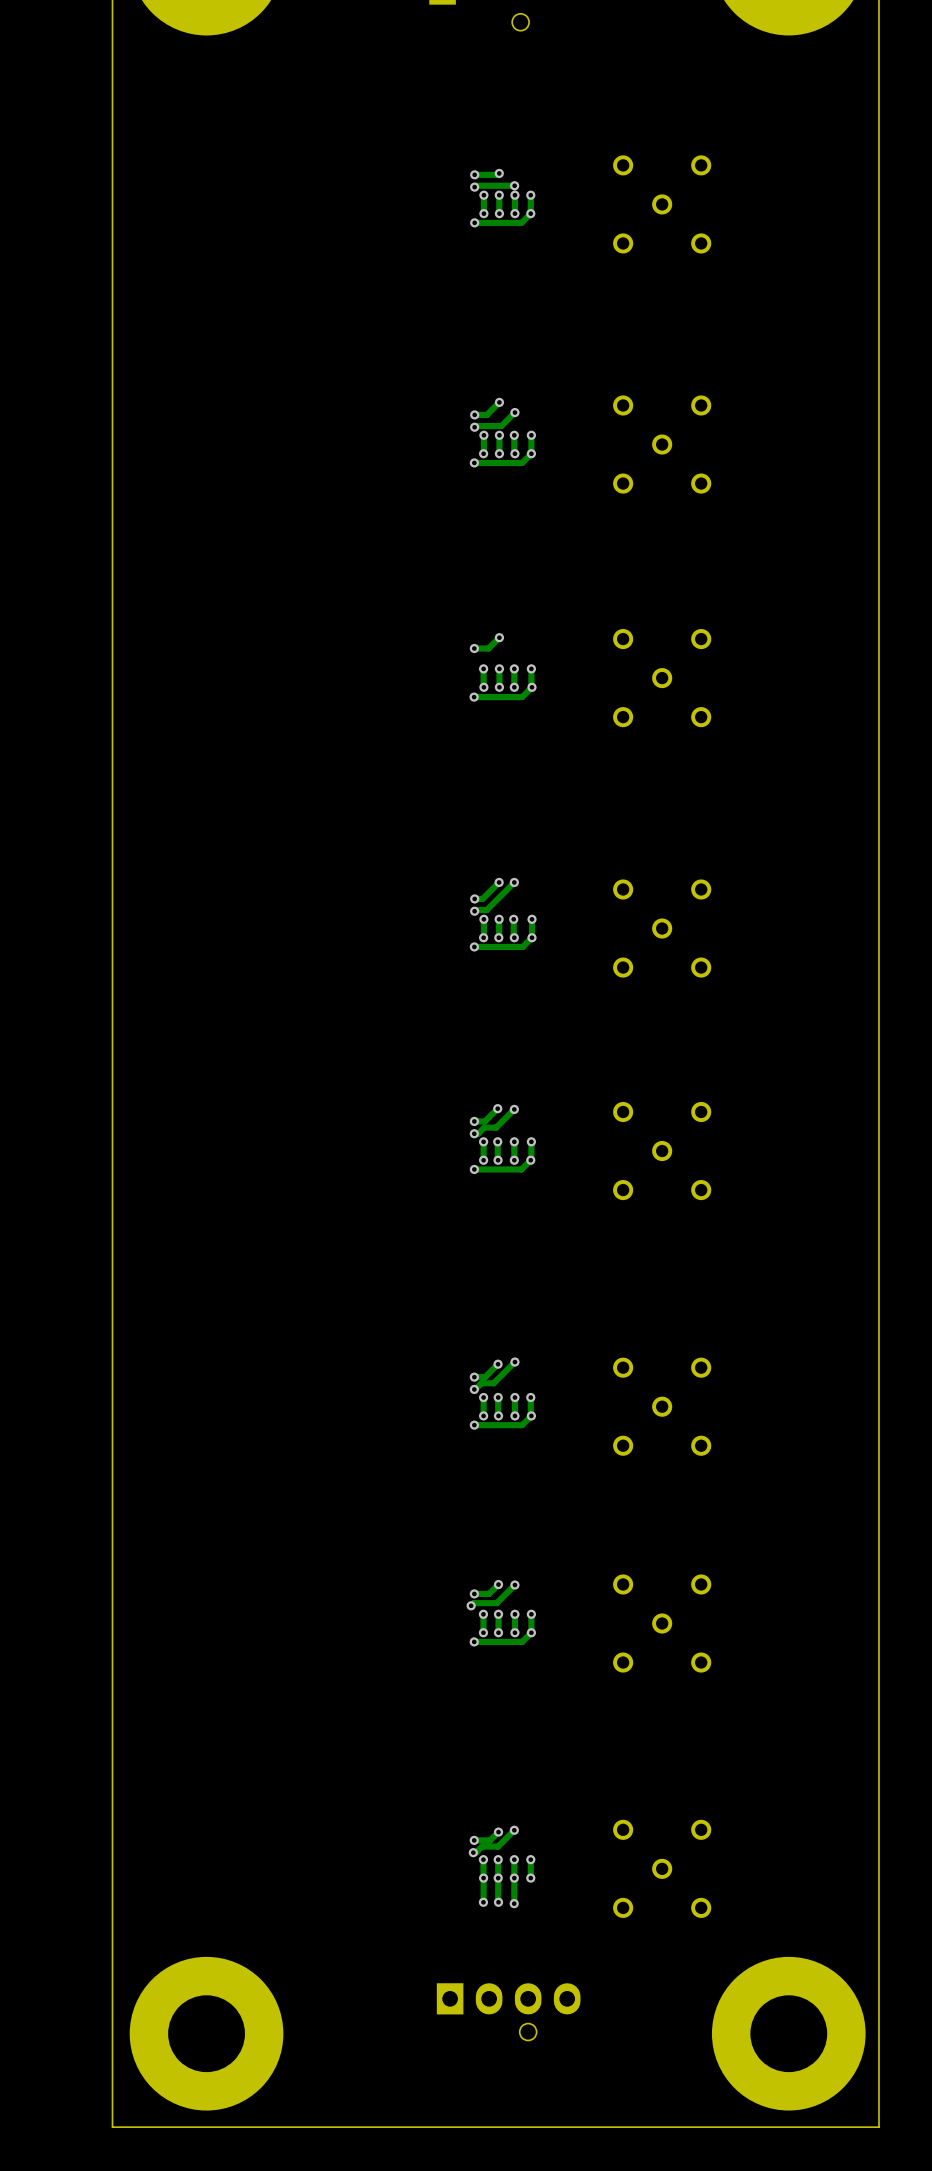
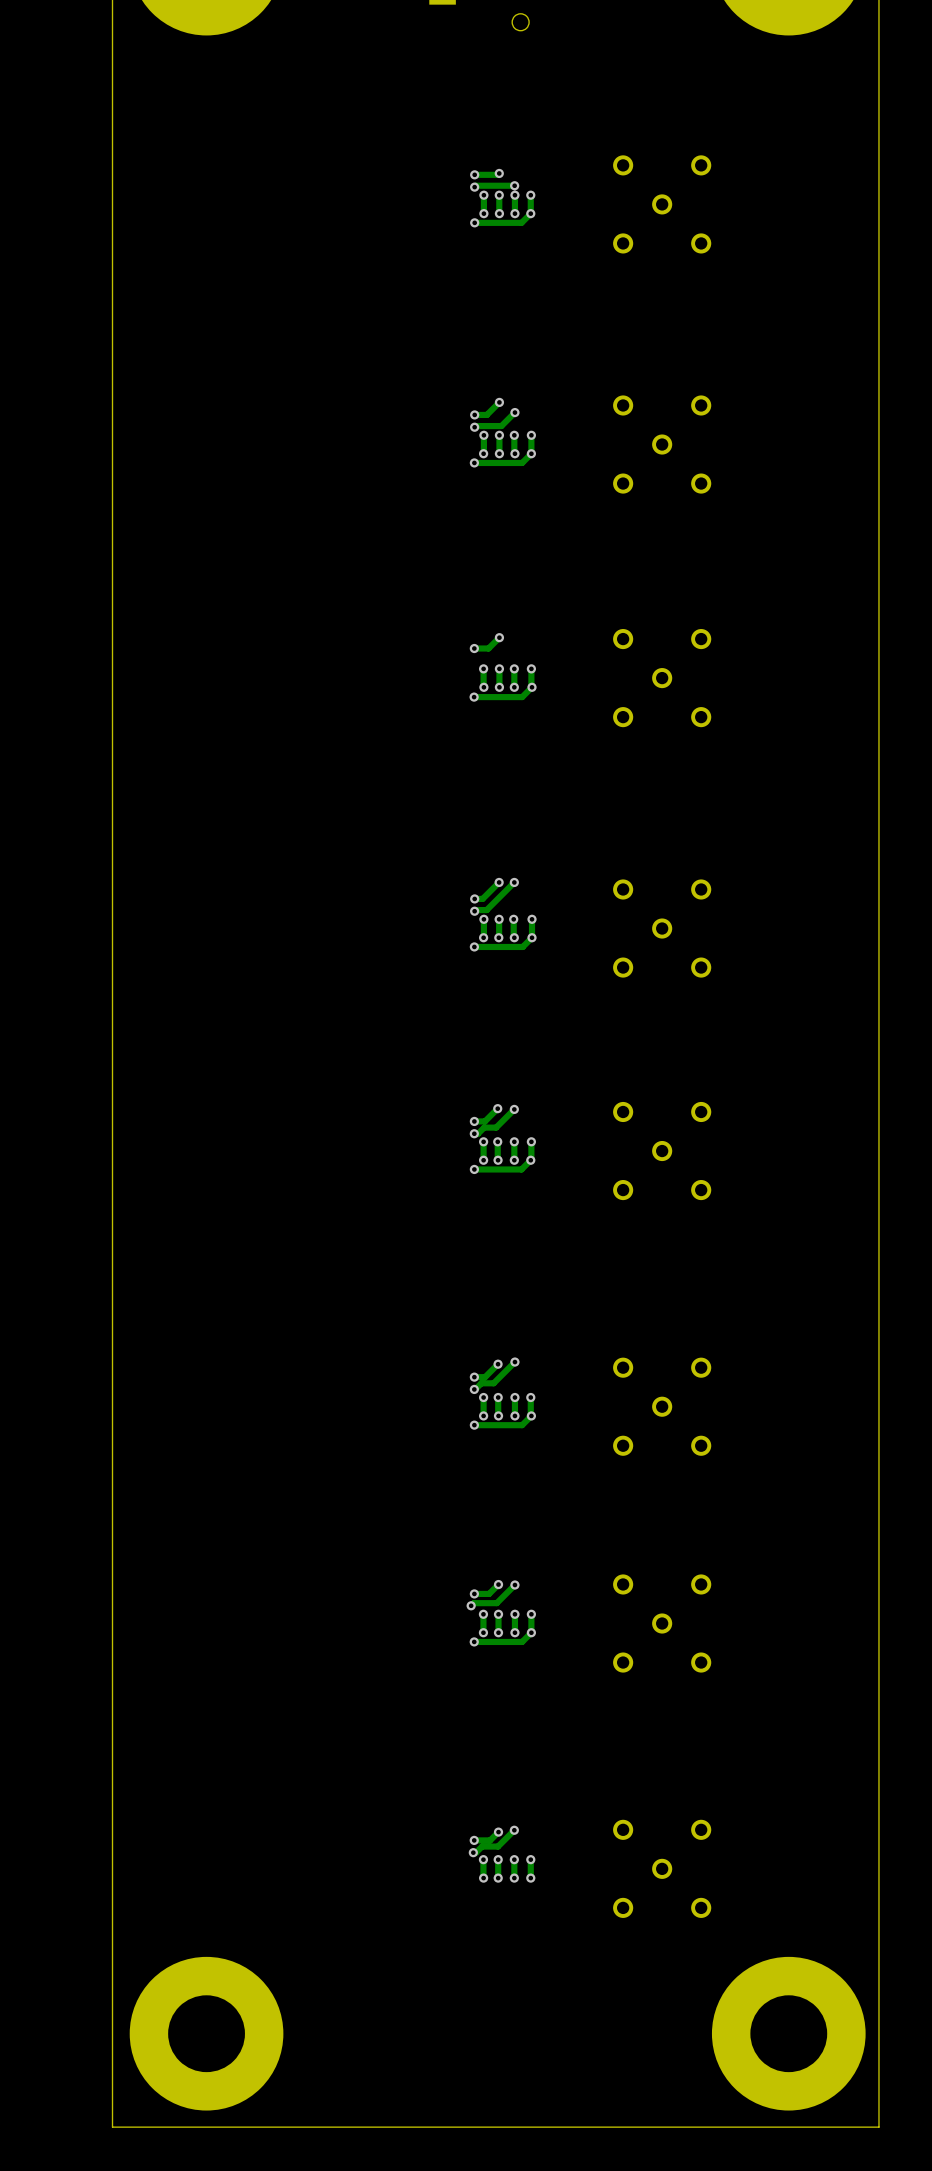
track: (483, 1878) (483, 1902) -> none
track: (498, 1878) (498, 1902) -> none
track: (514, 1878) (514, 1903) -> none
via: (483, 1902) -> none
via: (498, 1902) -> none
via: (514, 1903) -> none
part: (508, 2011) -> none

